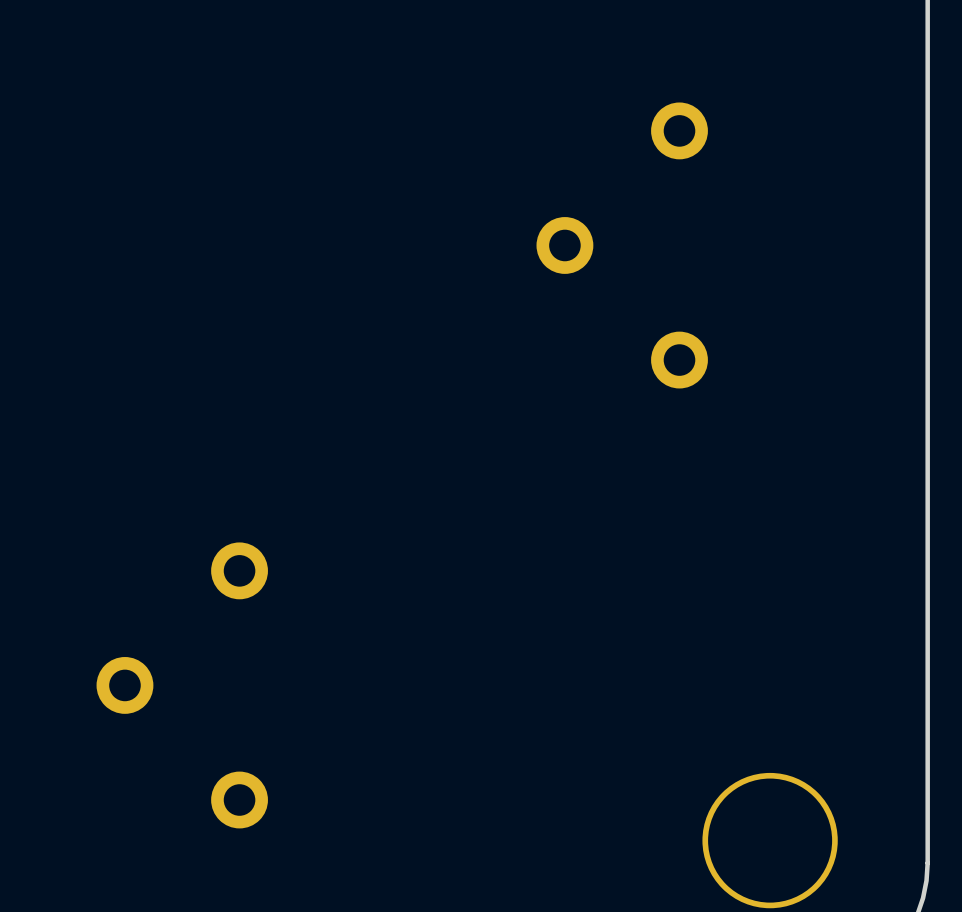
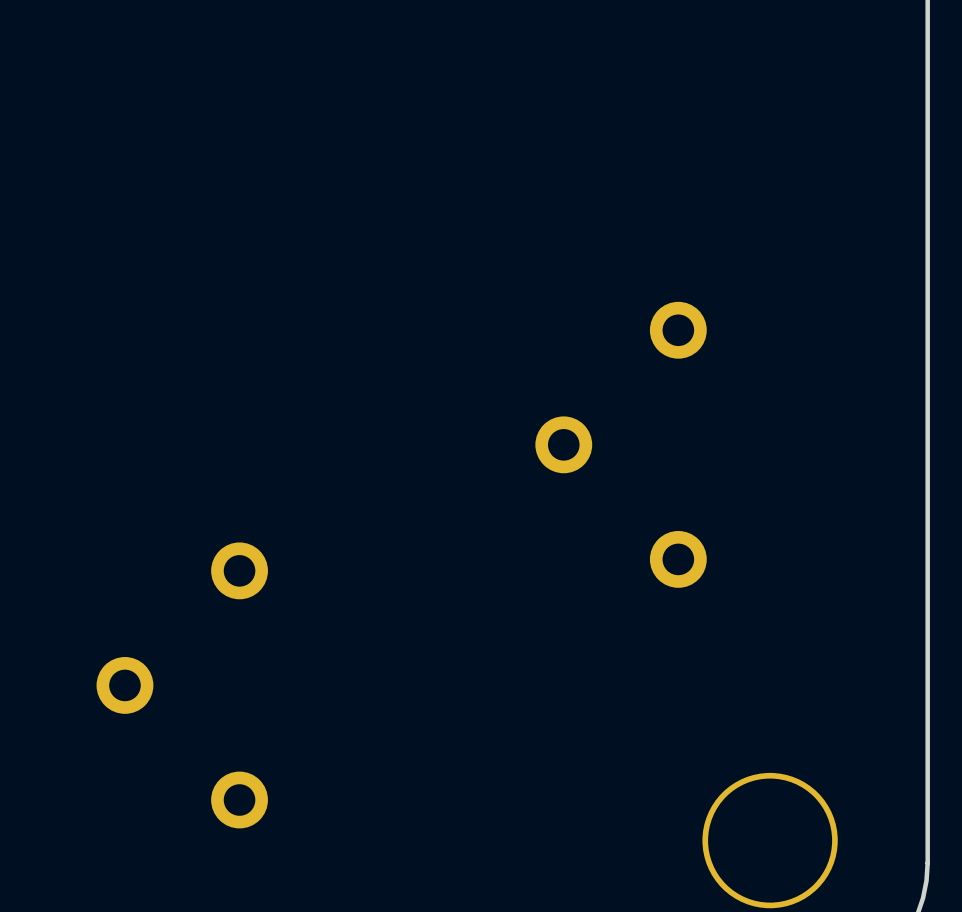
part position: (622, 245) -> (621, 444)

